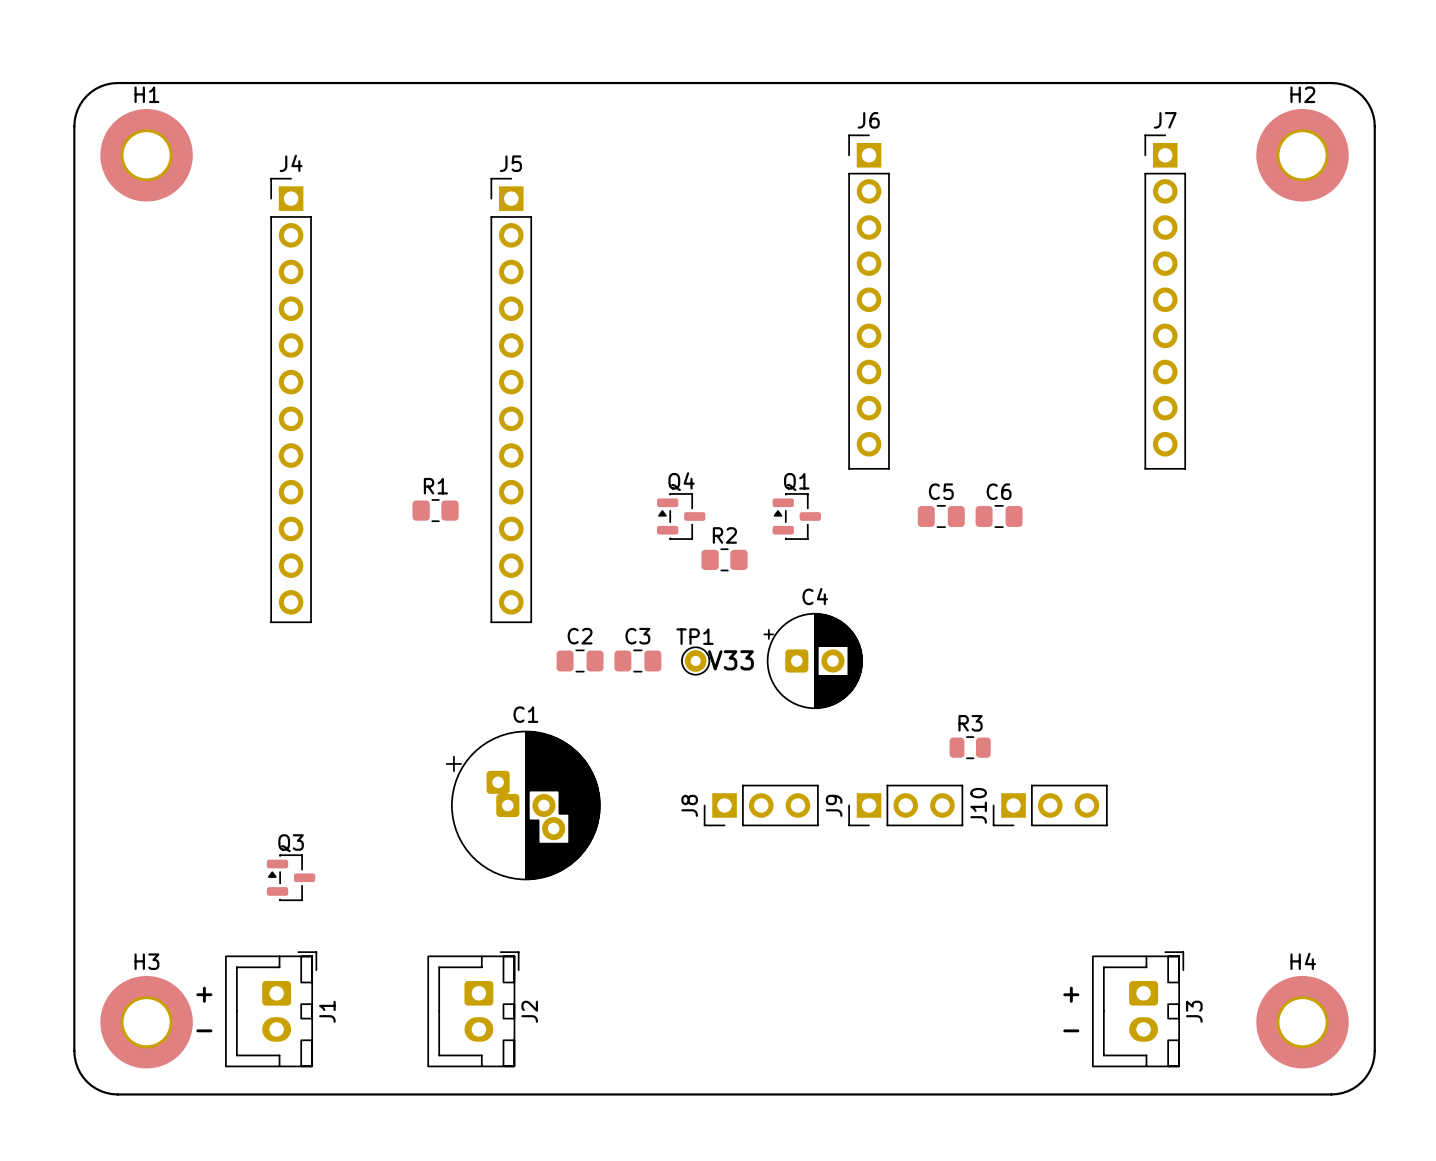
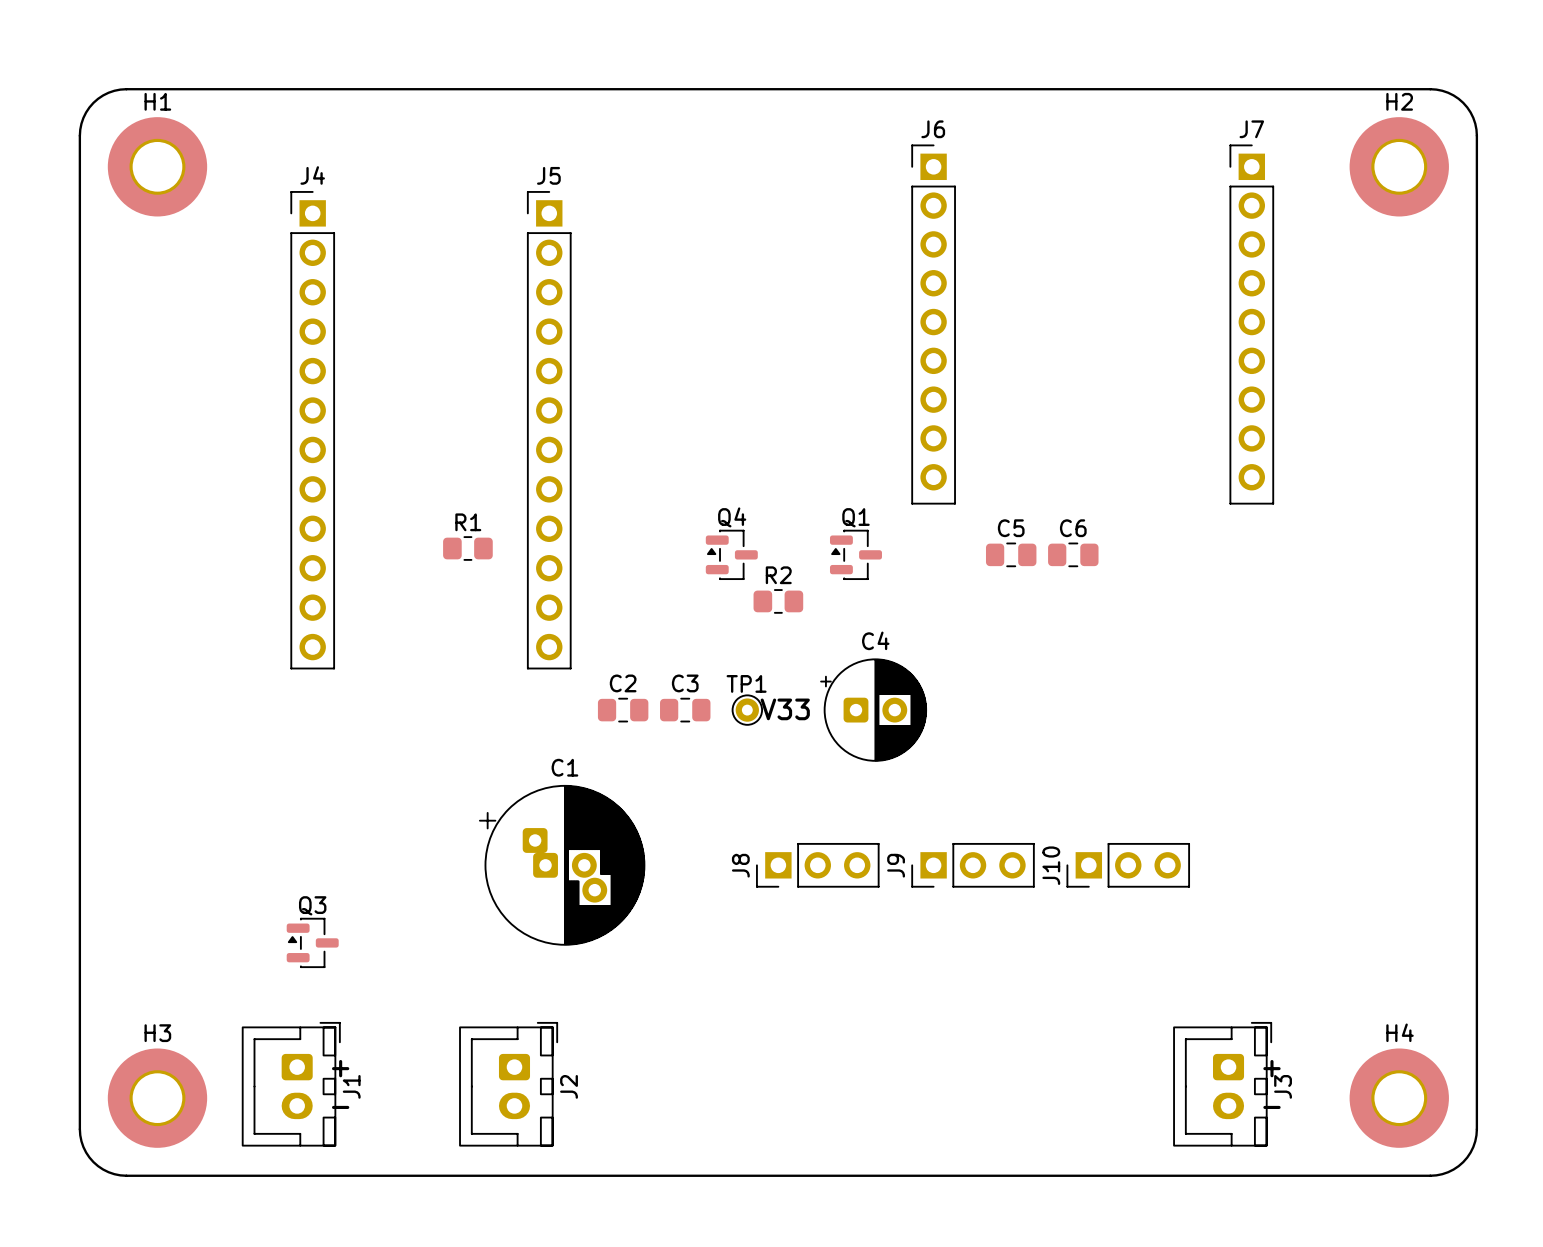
R3: (970, 747) -> none
text position: + (204, 994) -> + (340, 1068)
text position: + (1071, 994) -> + (1271, 1068)
text position: - (204, 1030) -> - (340, 1107)
text position: - (1071, 1030) -> - (1271, 1107)

